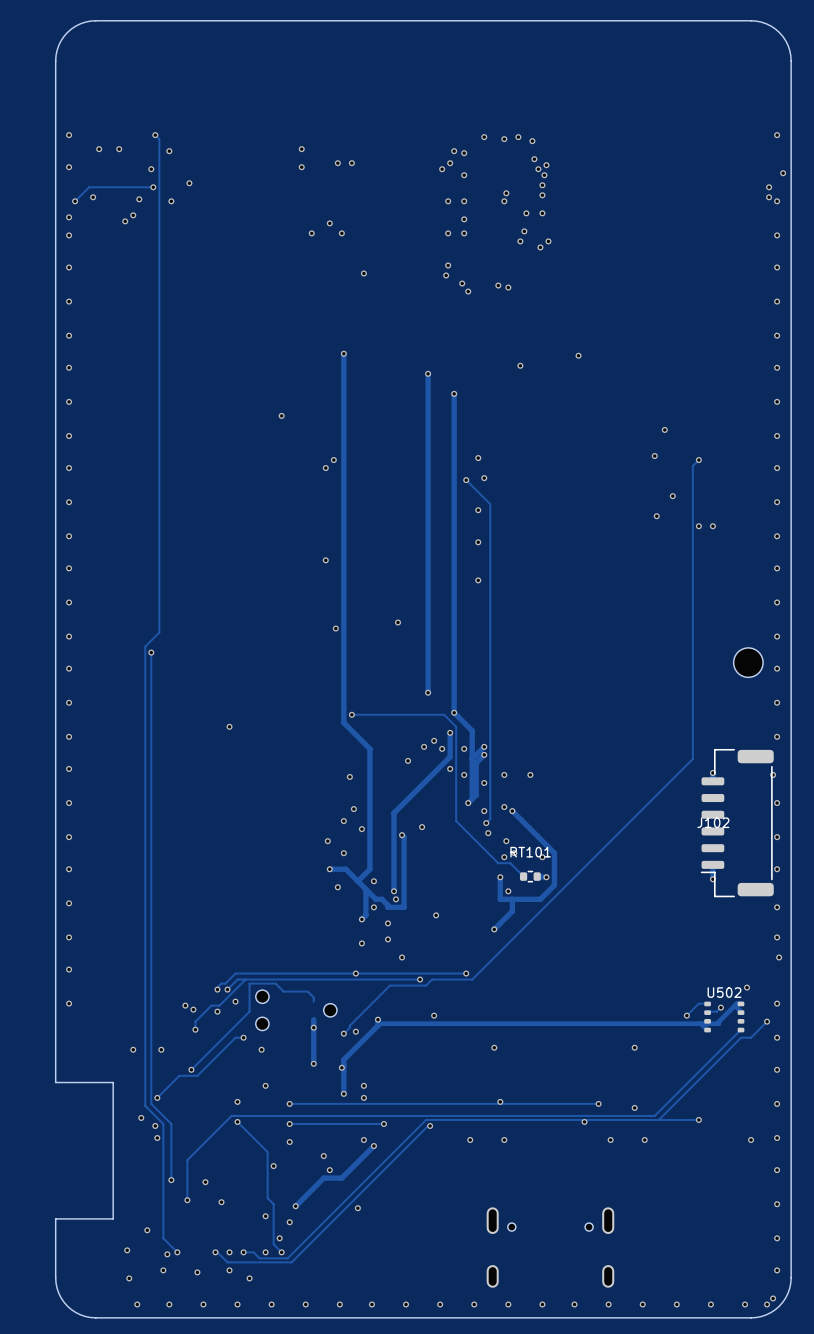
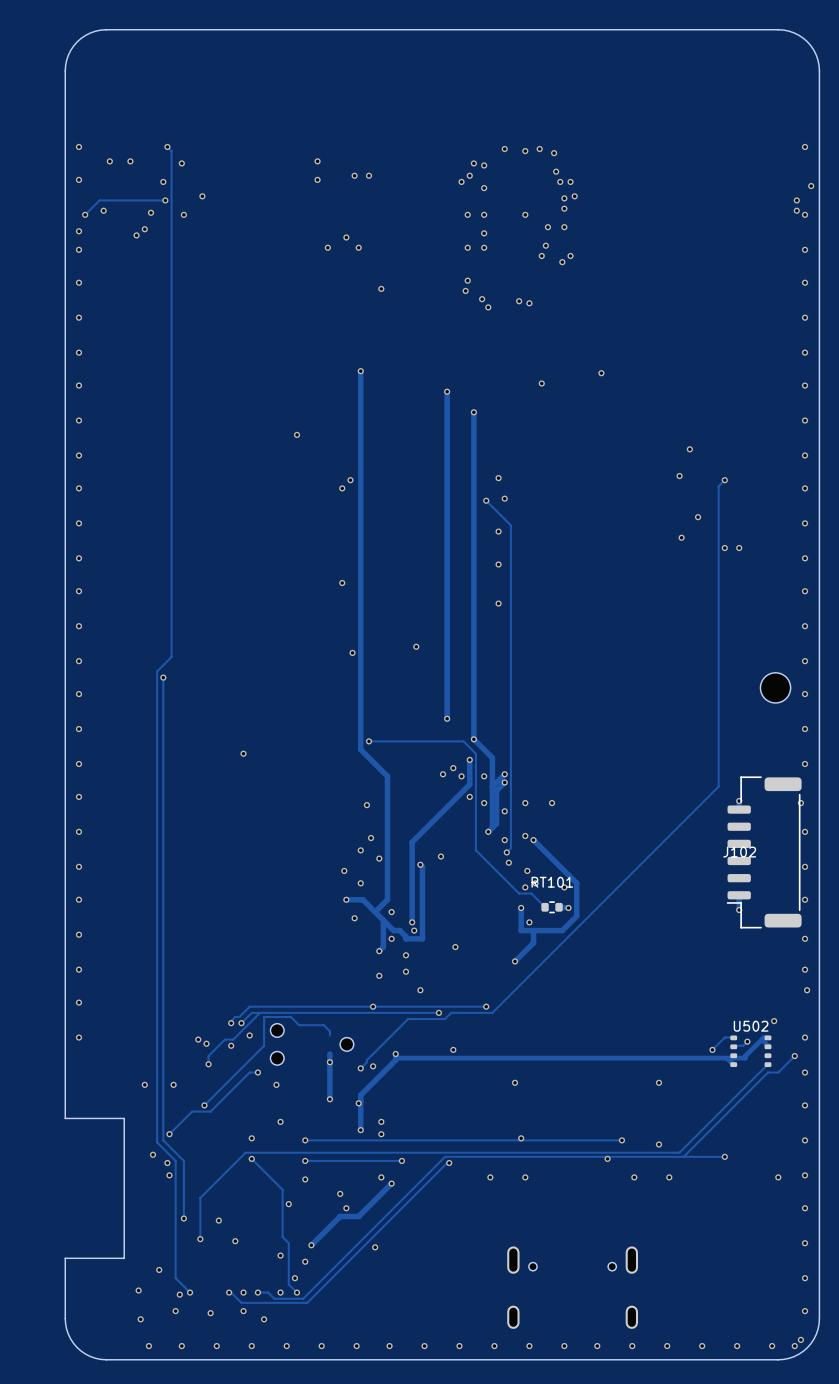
via: (546, 165) -> none
via: none -> (570, 181)
via: (544, 175) -> none
via: none -> (574, 196)
via: (506, 193) -> none
via: (408, 760) -> none

